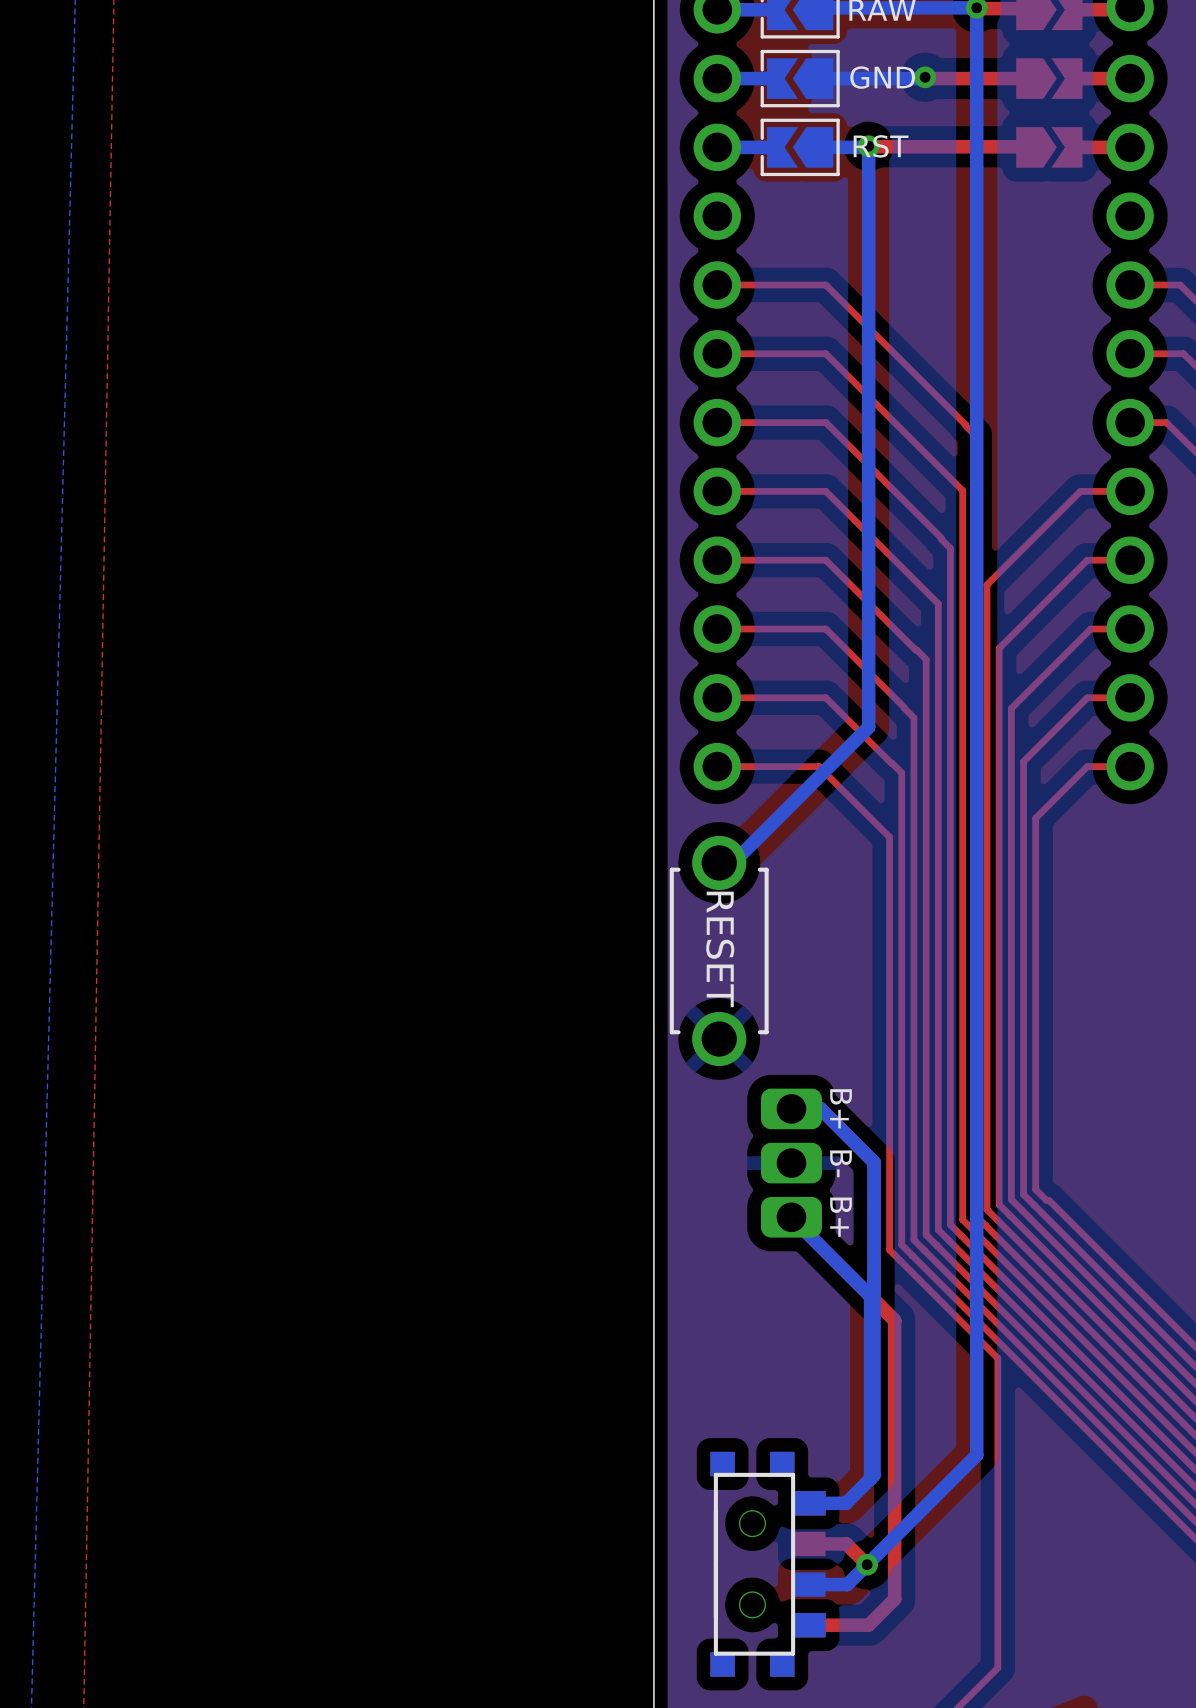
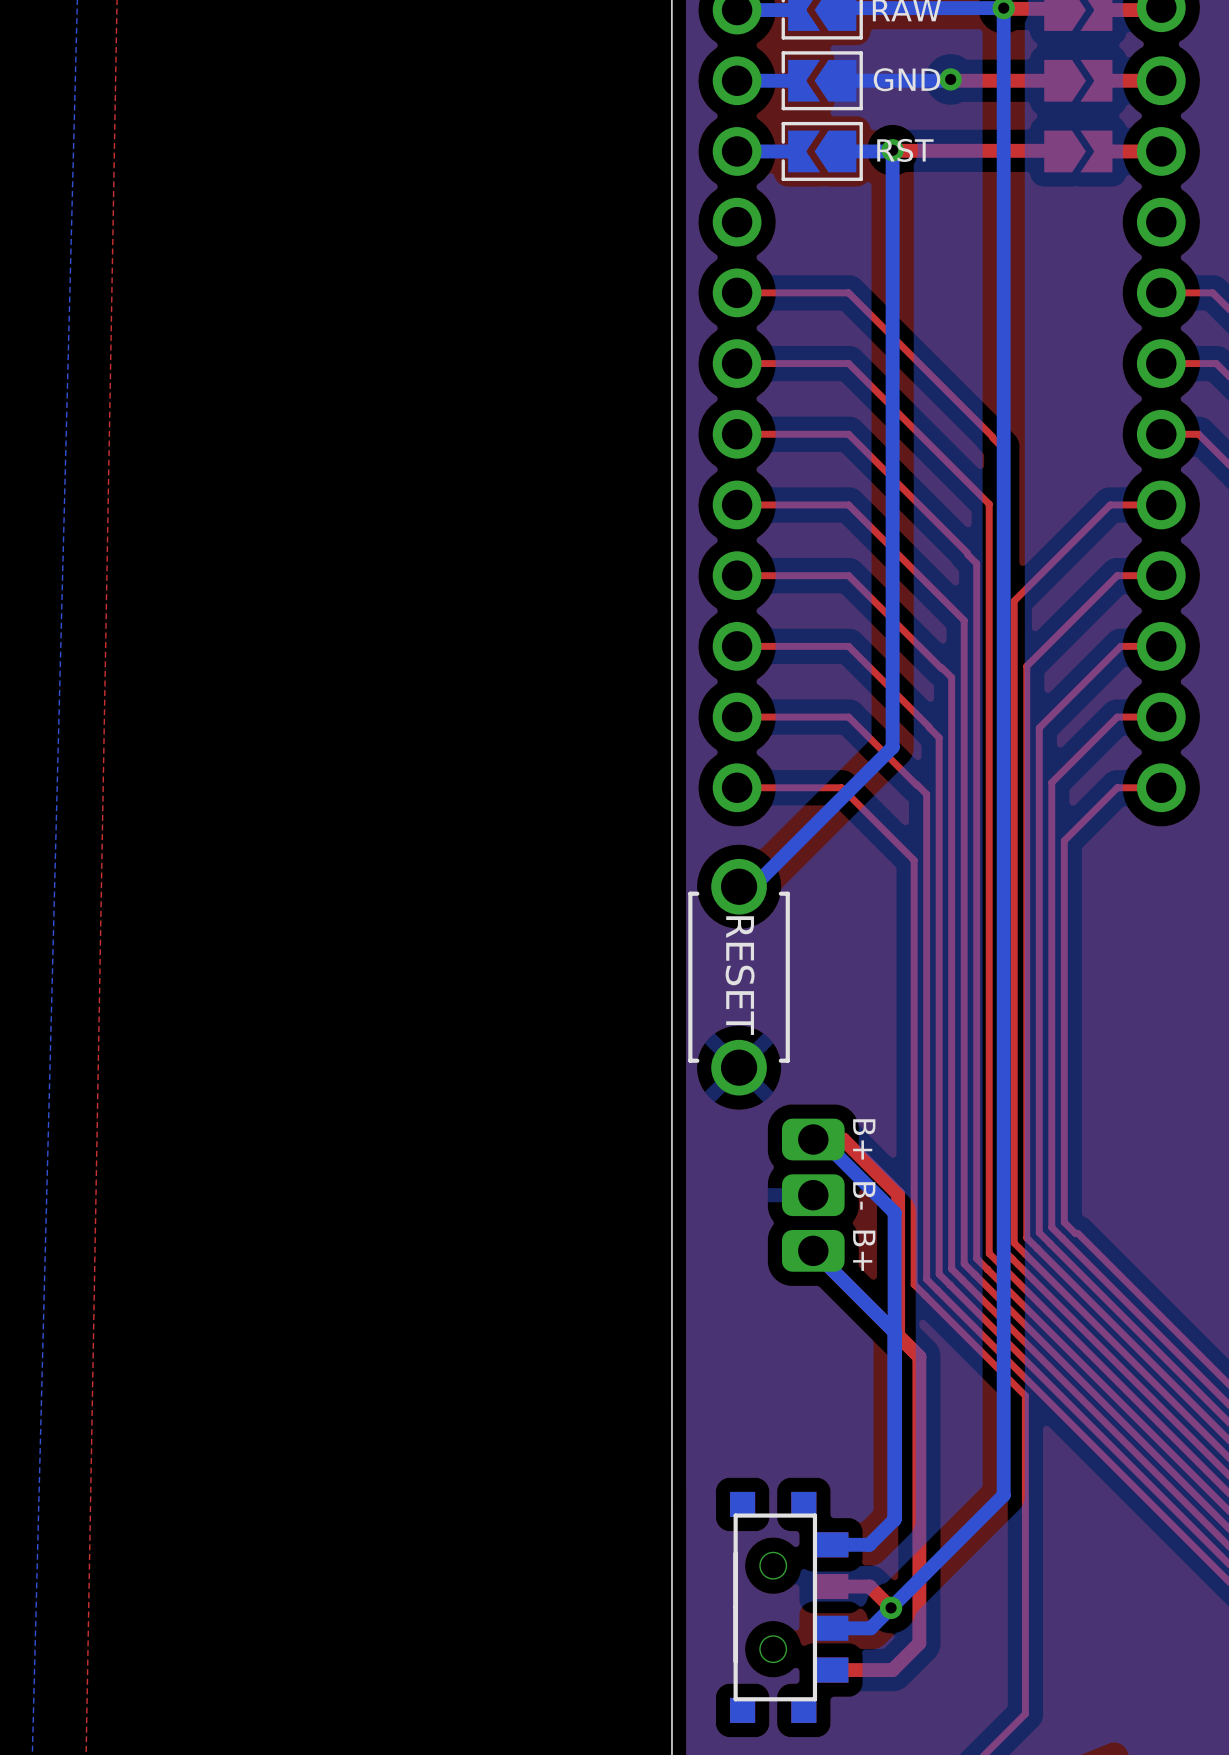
bottom track: (799, 1108) (820, 1108) (874, 1162) (874, 1475) (870, 1478) -> (821, 1139) (894, 1212) (894, 1332)

